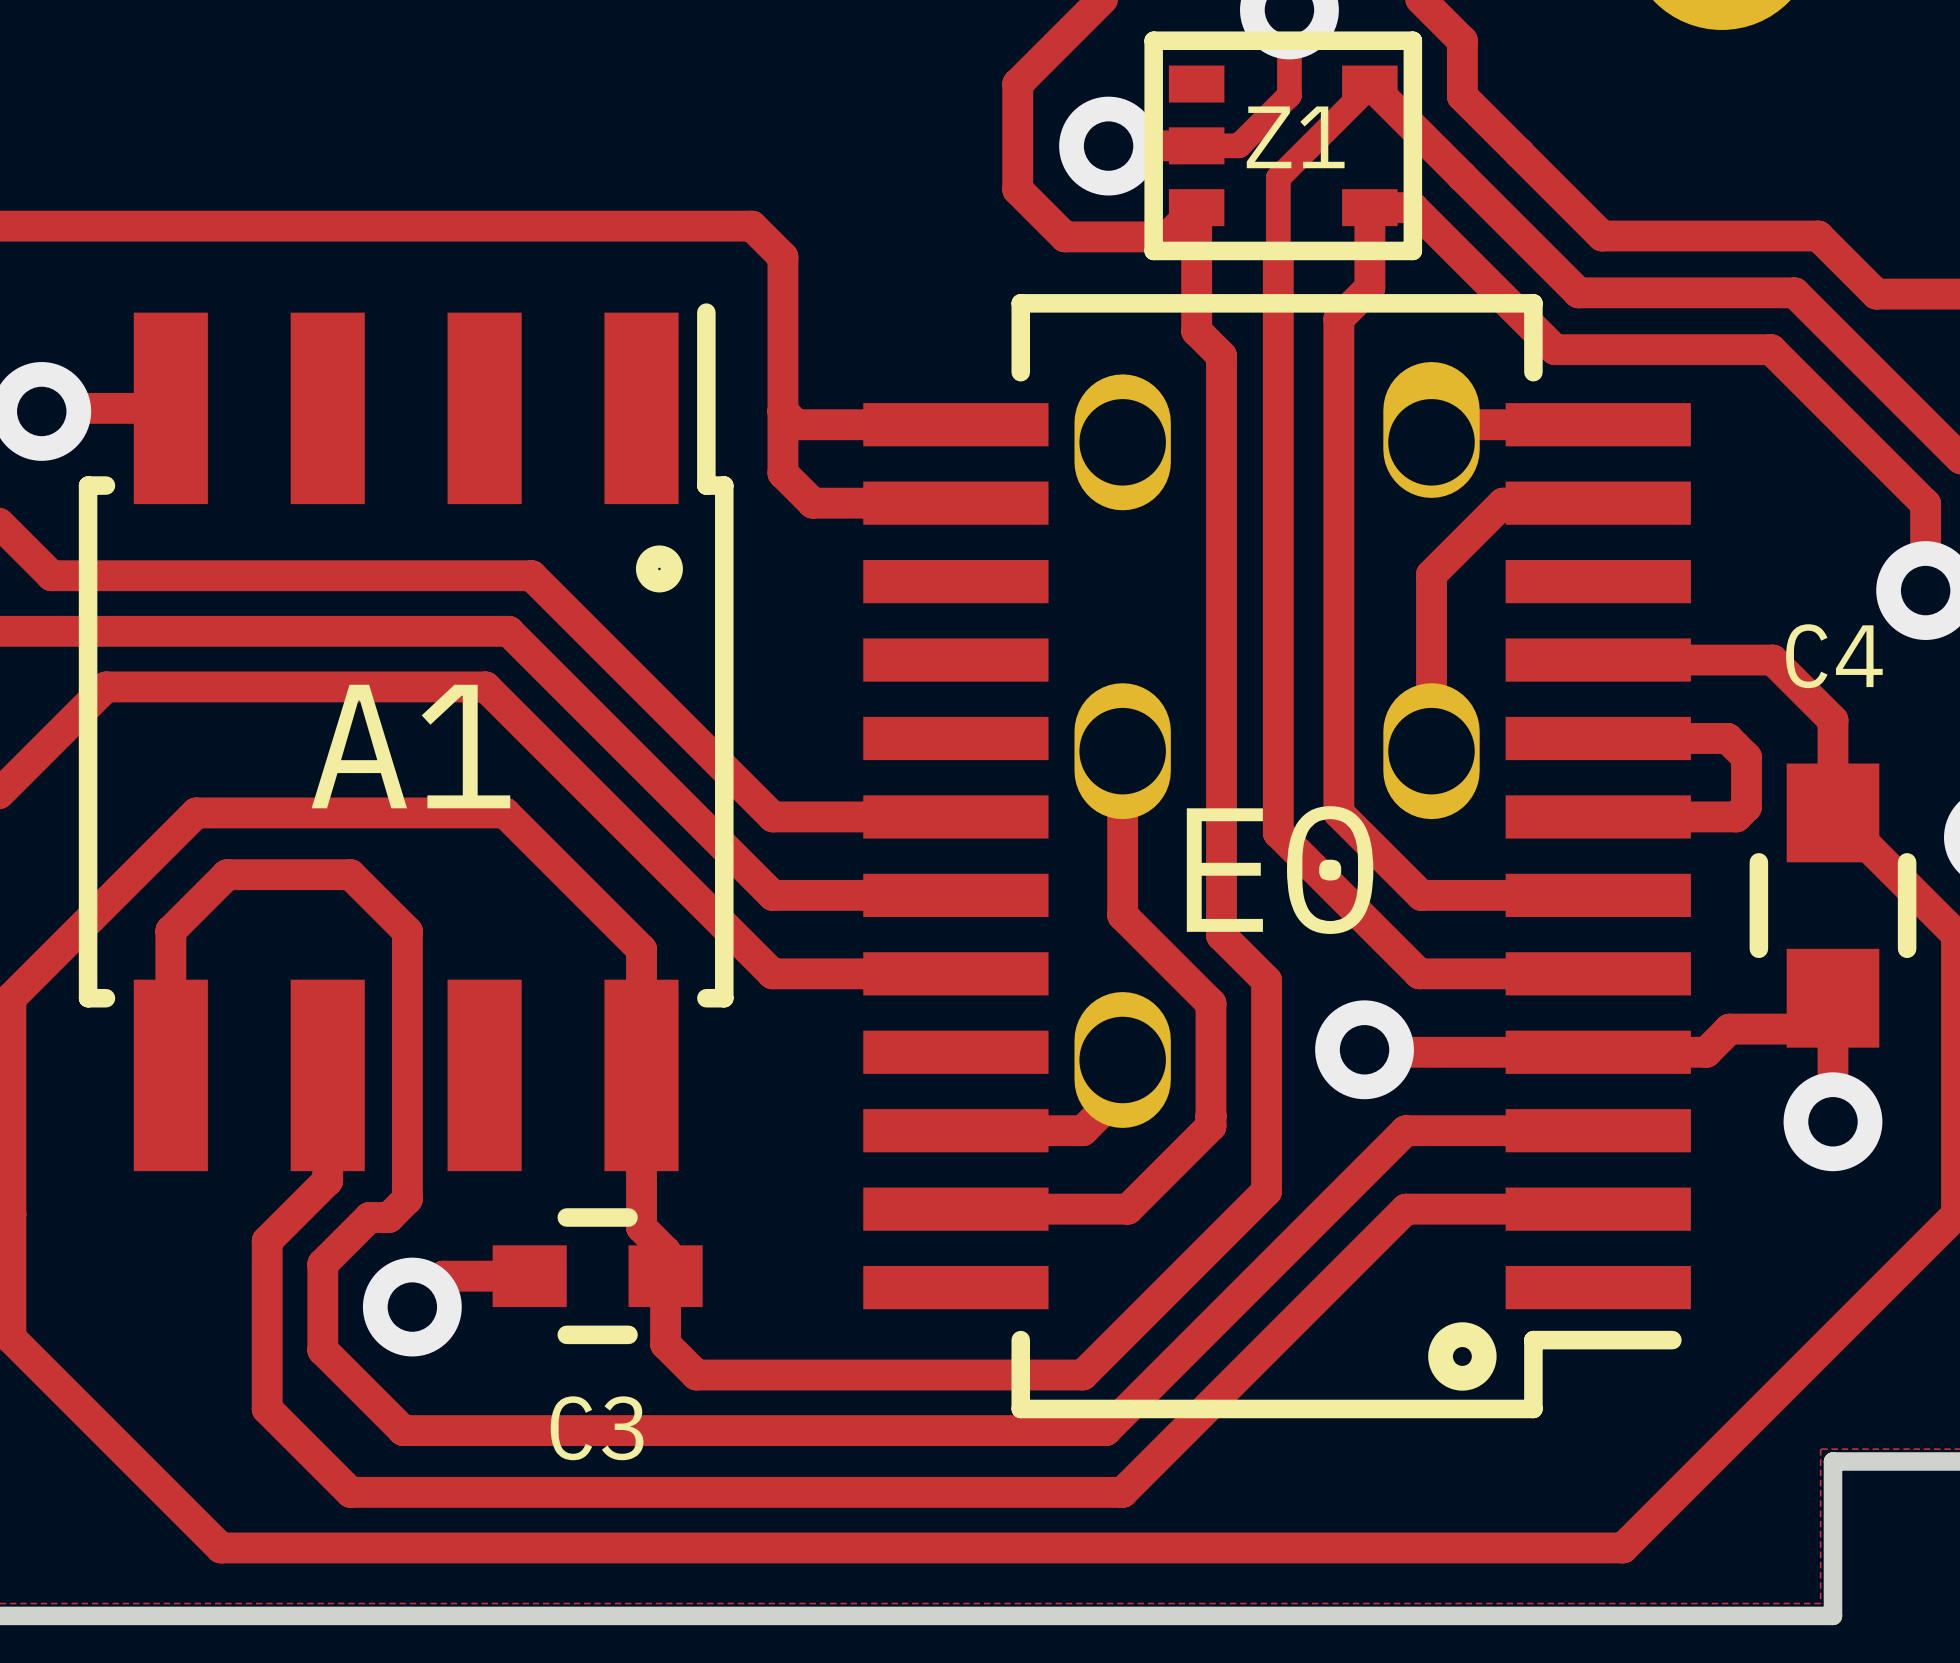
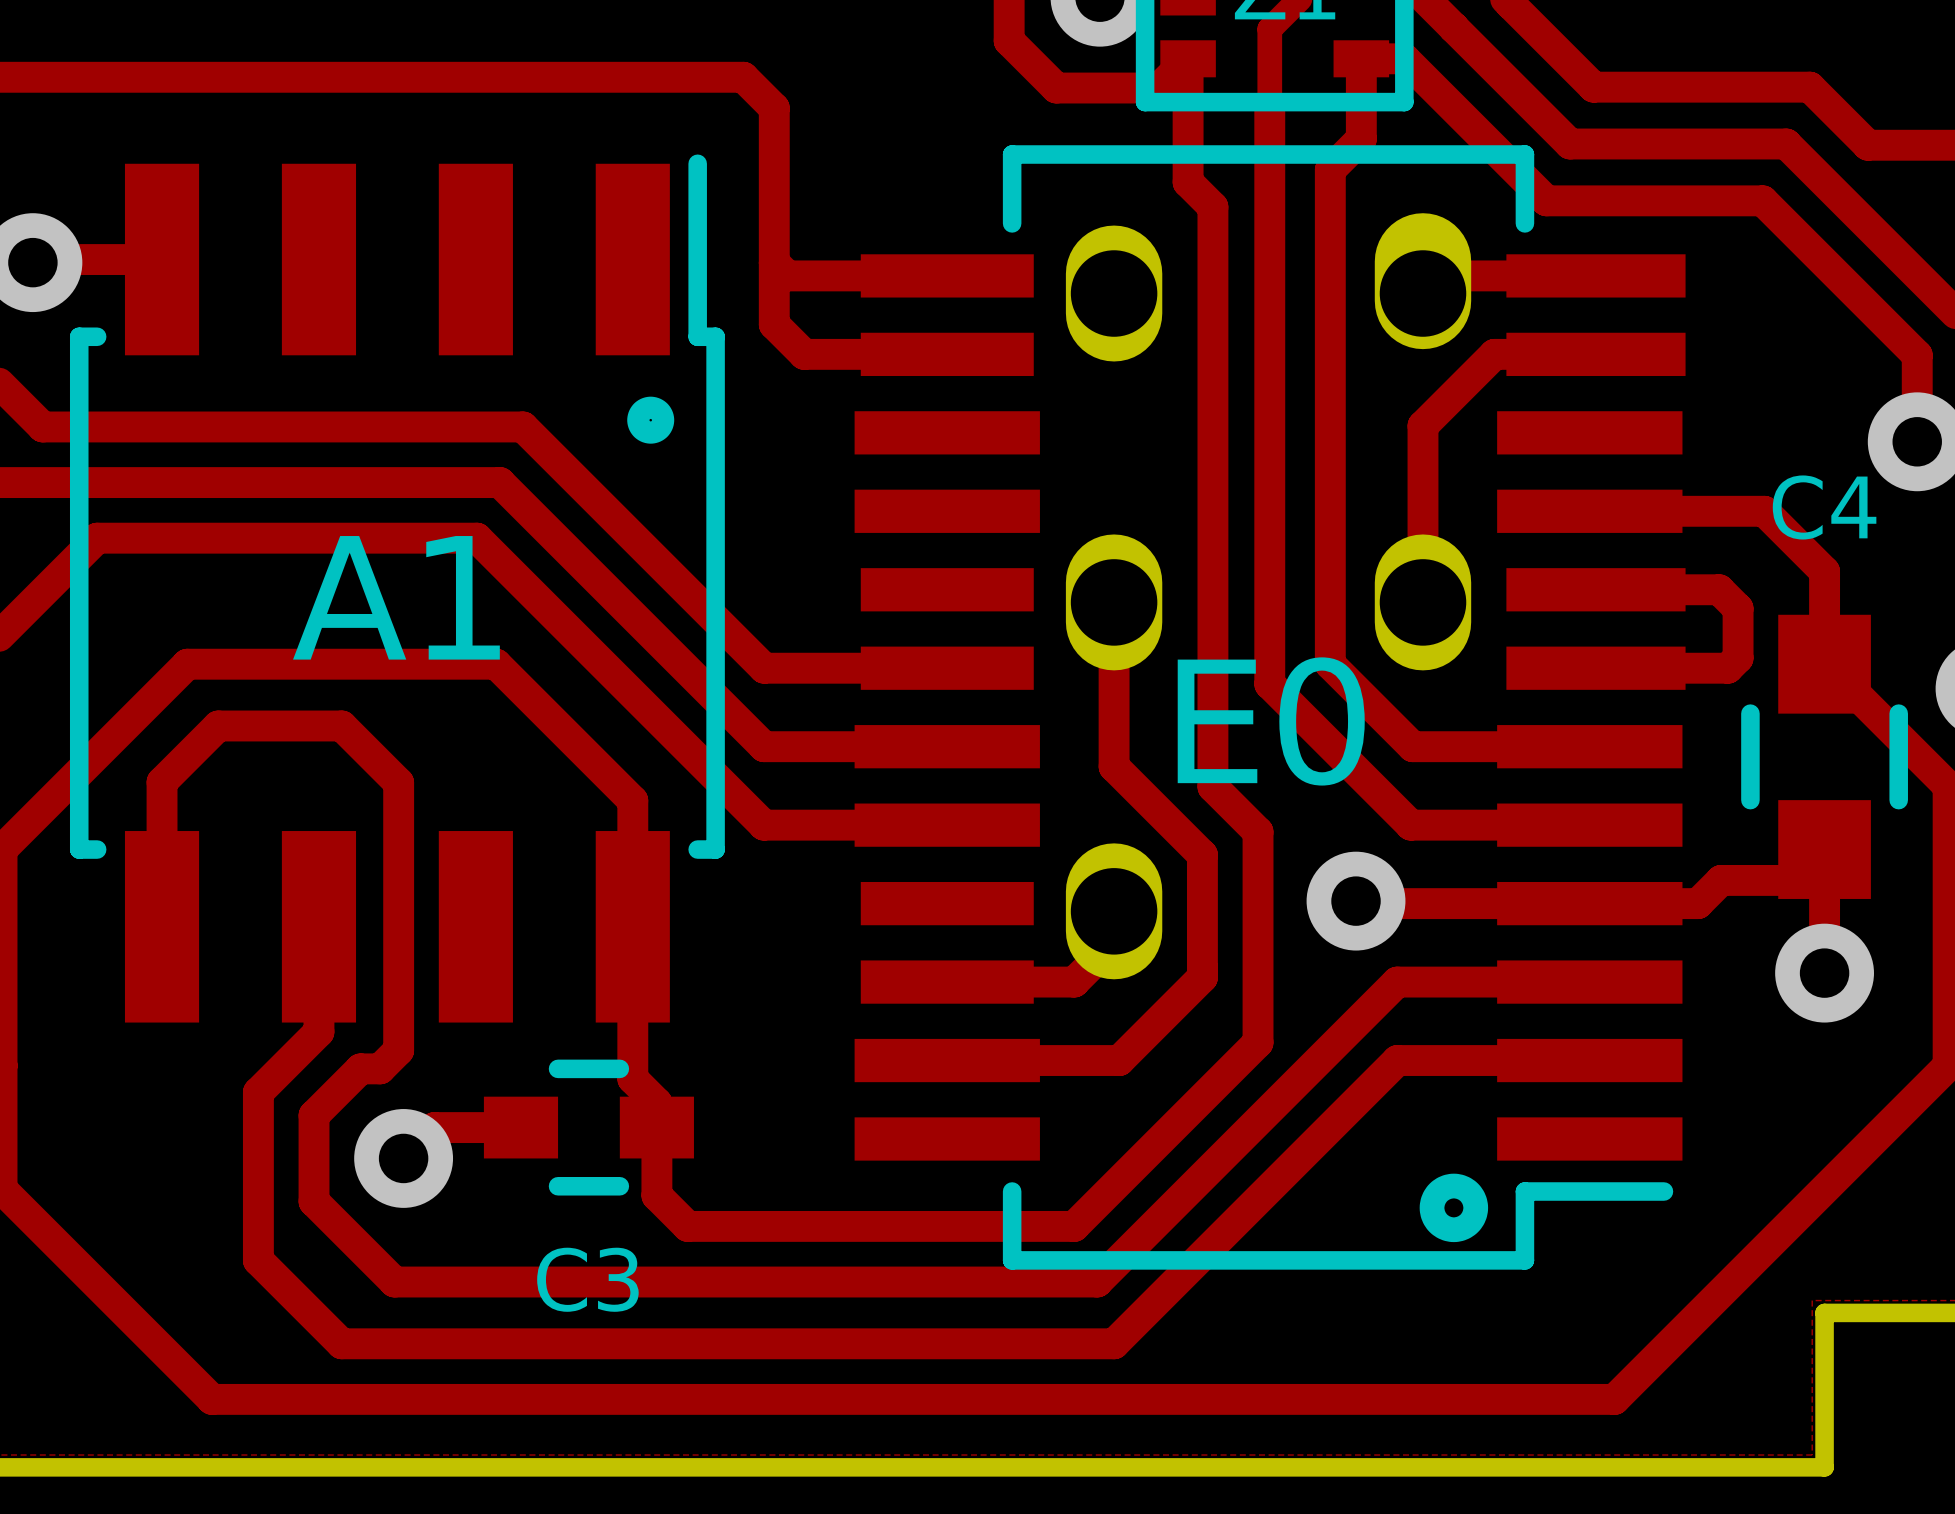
E0 footprint: [863, 294, 1691, 1419] -> [854, 145, 1686, 1270]

